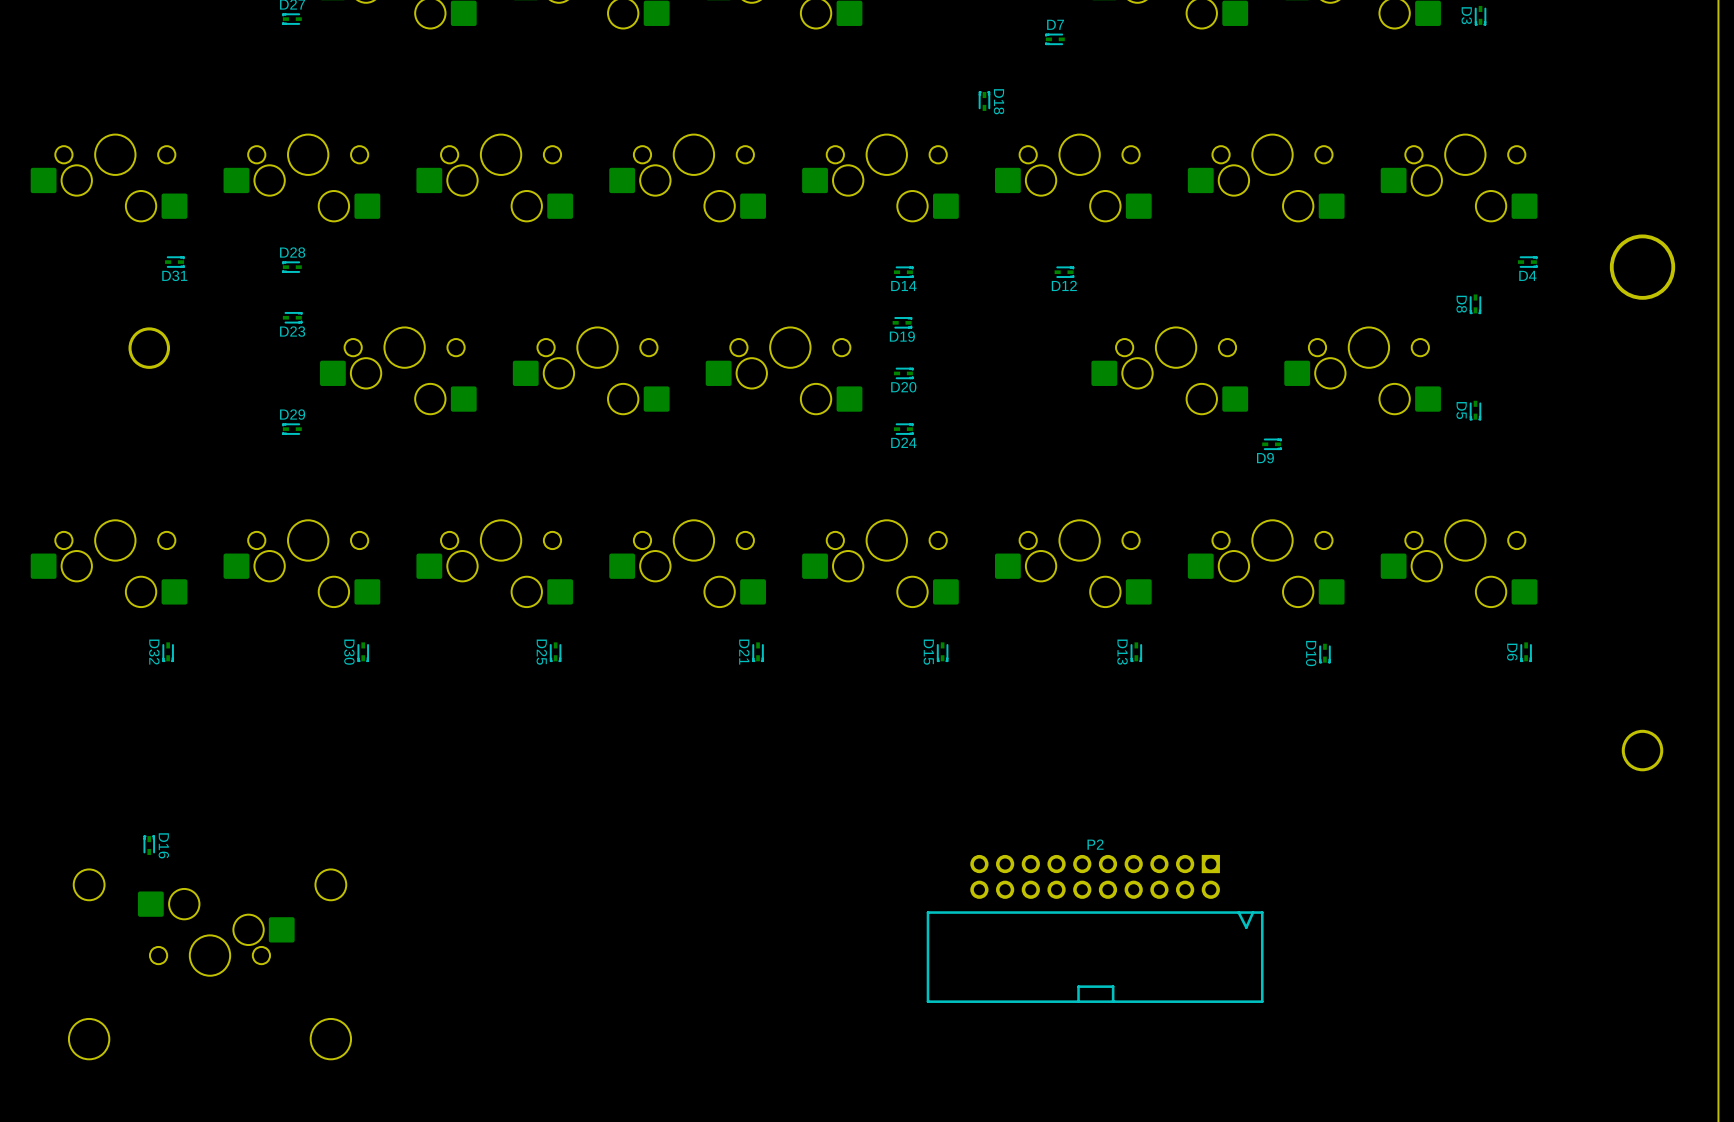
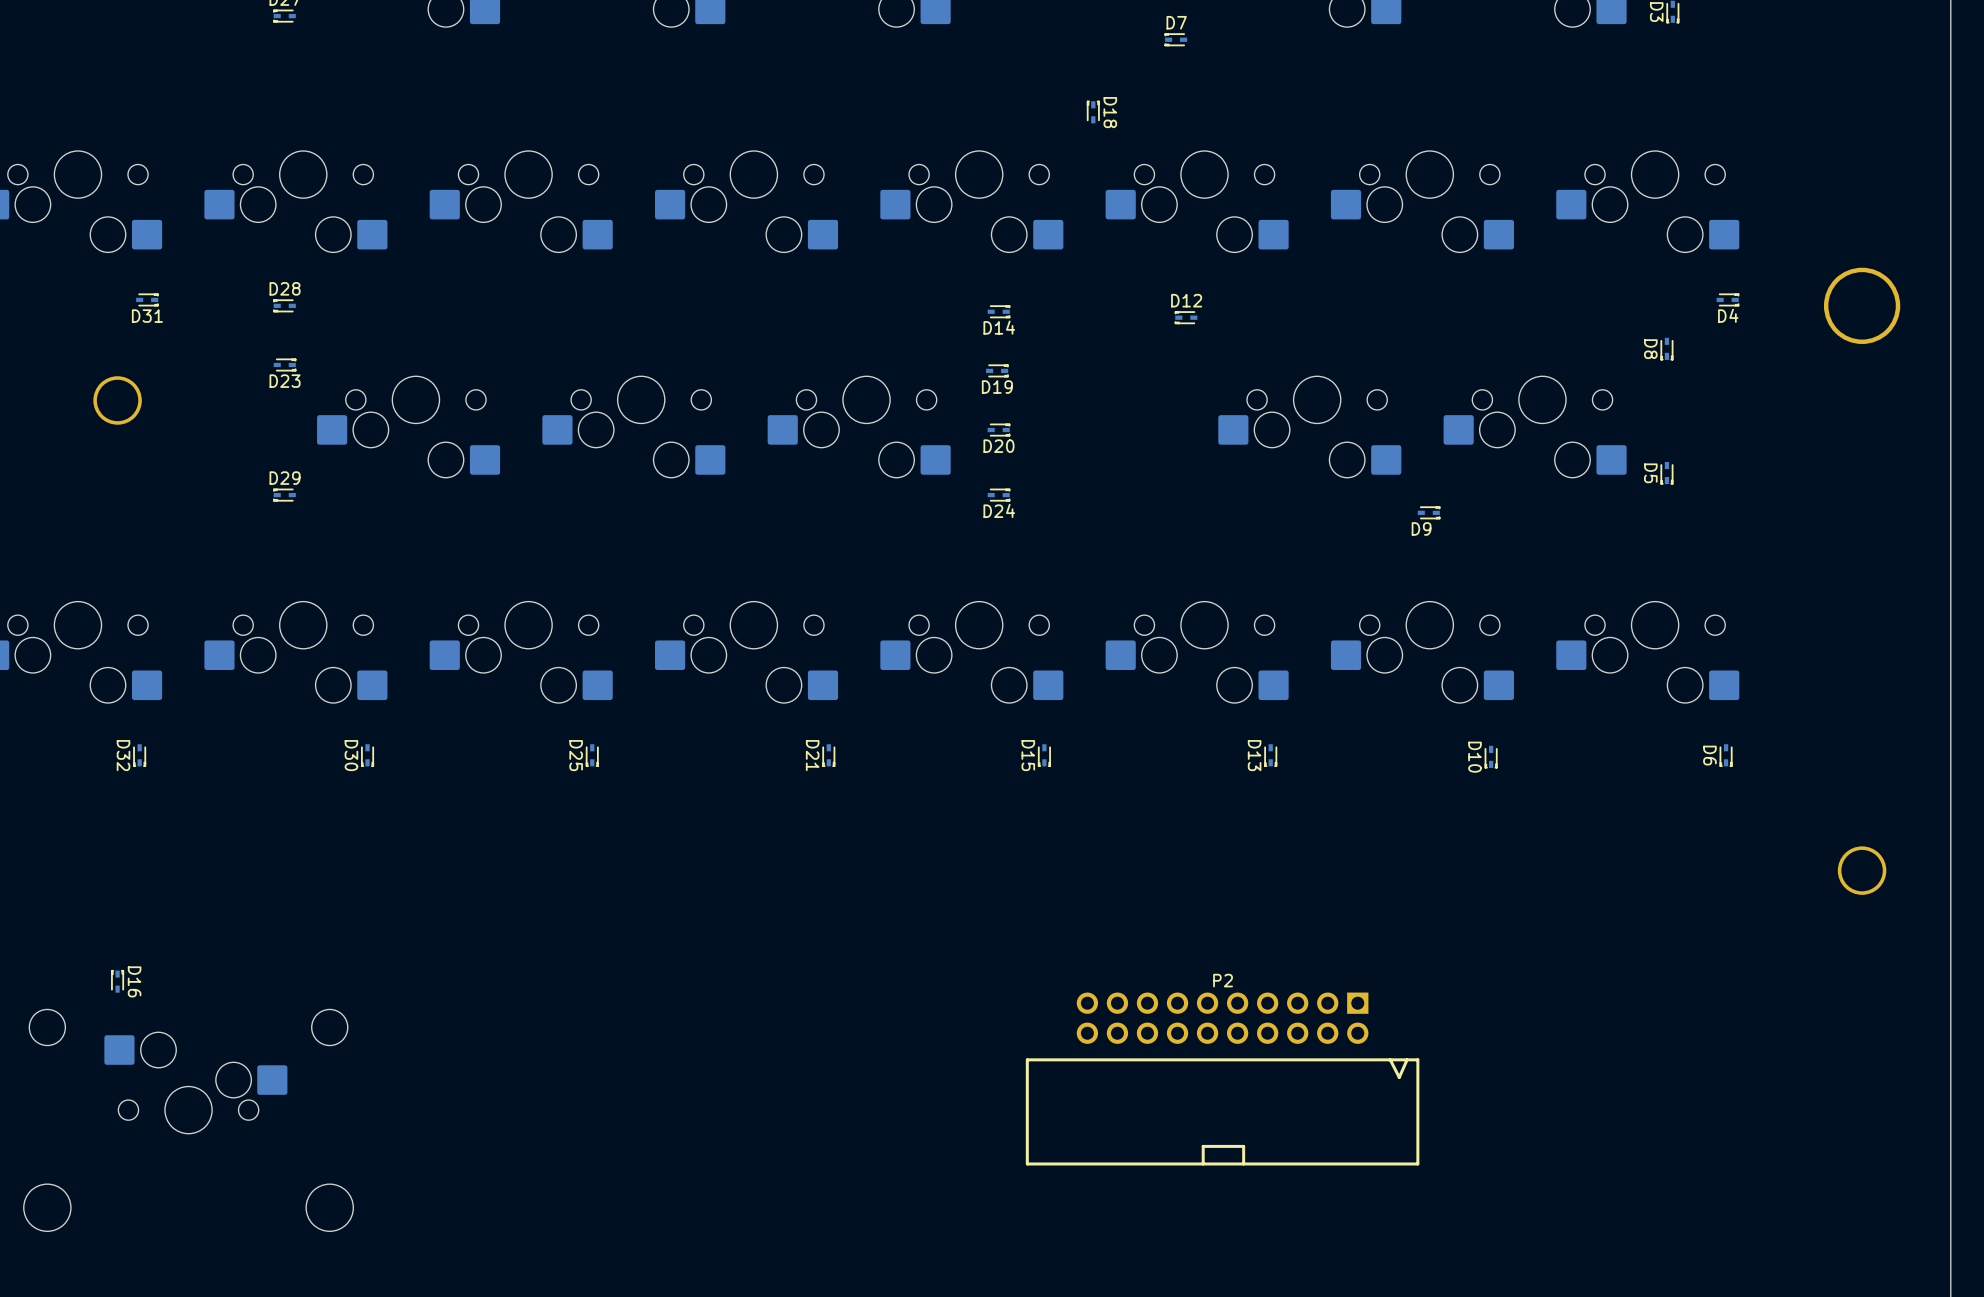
D12 rotation: 0° (1064, 272) -> 180° (1186, 317)

